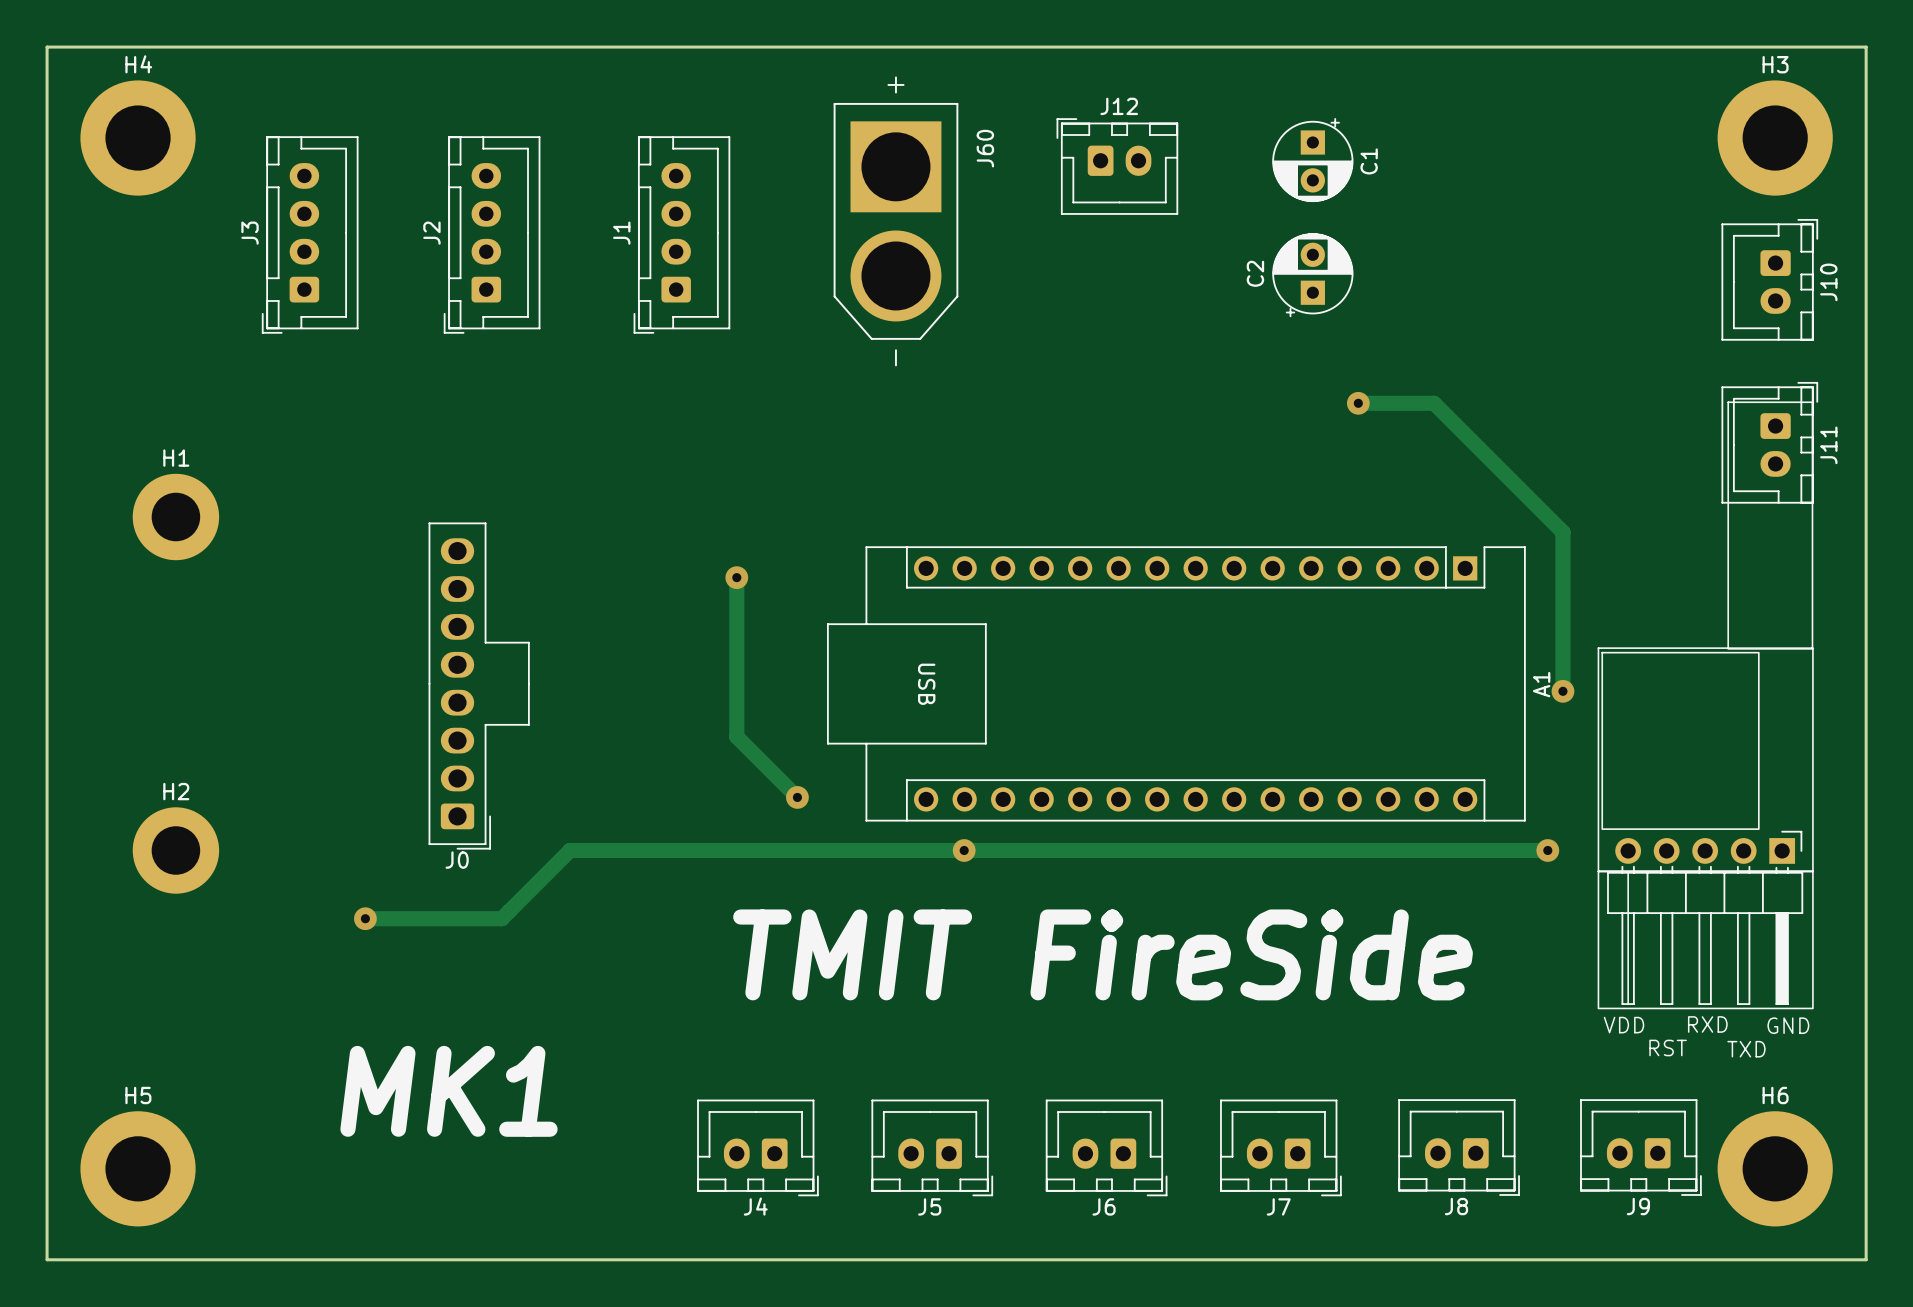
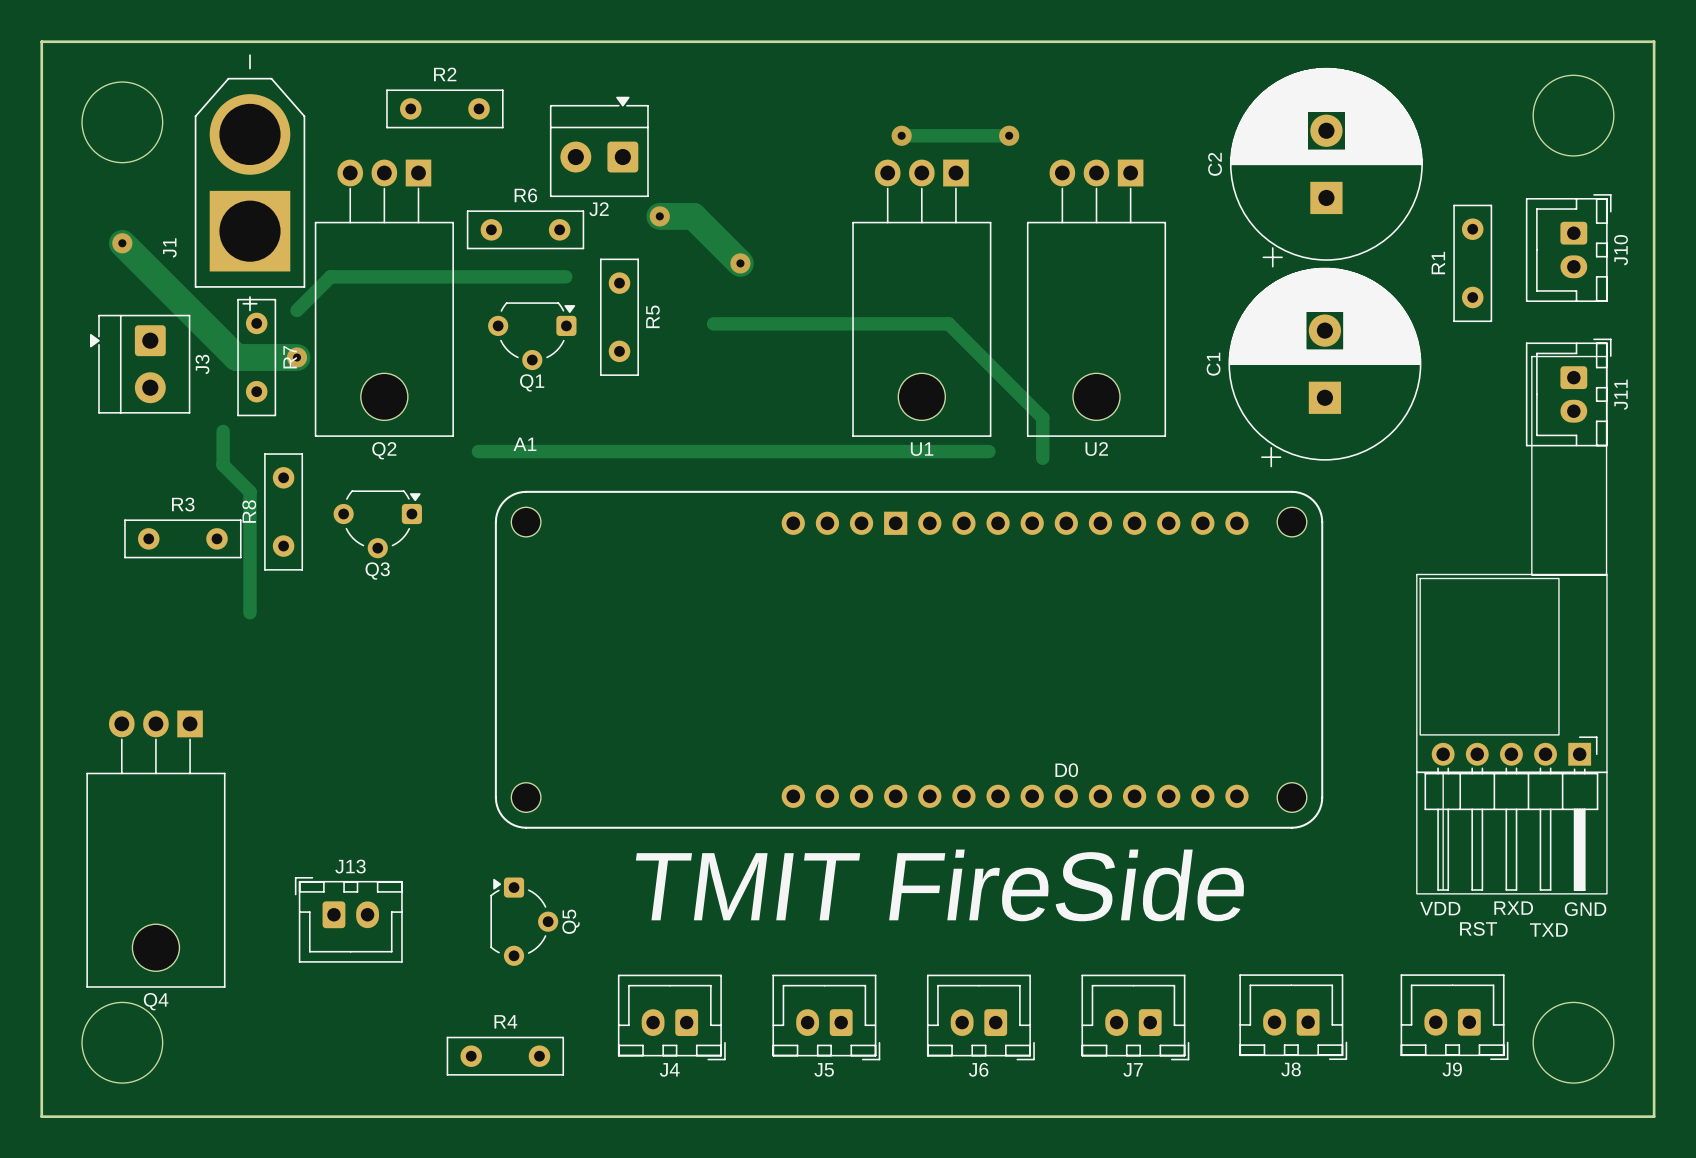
round board edge: none -> [1532, 74, 1615, 157]
round board edge: none -> [81, 81, 164, 164]
C1 footprint: [1272, 118, 1354, 203] -> [1228, 267, 1422, 468]
R2: none -> (444, 108)
J3 footprint: [261, 136, 359, 334] -> [89, 314, 191, 414]
J2 footprint: [443, 136, 541, 334] -> [549, 96, 649, 198]
J1 footprint: [633, 136, 731, 334] -> [194, 54, 306, 312]
H4: (138, 138) -> none
H3: (1775, 138) -> none
track: none -> (901, 135) (1009, 135)
via: none -> (901, 135)
via: none -> (1009, 135)
C1 name position: C1 (1369, 161) -> C1 (1213, 364)
J12: (1117, 166) -> none
J60: (895, 221) -> none
J3 name position: J3 (250, 233) -> J3 (202, 364)
J2 name position: J2 (431, 233) -> J2 (599, 209)
J1 name position: J1 (621, 233) -> J1 (169, 247)
C2 footprint: [1272, 233, 1354, 318] -> [1229, 67, 1423, 268]
track: none -> (659, 216) (693, 216) (740, 263)
via: none -> (659, 216)
R6: none -> (525, 229)
C2 name position: C2 (1255, 273) -> C2 (1215, 164)
track: none -> (122, 243) (236, 357) (297, 357)
via: none -> (122, 243)
via: none -> (740, 263)
R1: none -> (1472, 263)
track: none -> (565, 276) (330, 276) (297, 310)
Q2: none -> (384, 298)
U1: none -> (921, 298)
U2: none -> (1096, 298)
R5: none -> (619, 317)
track: none -> (713, 323) (948, 323) (1042, 417) (1042, 458)
Q1: none -> (532, 336)
R7: none -> (256, 357)
via: none -> (297, 357)
track: (1358, 403) (1434, 403) (1562, 532) (1562, 691) -> none
via: (1358, 403) -> none
track: none -> (223, 431) (223, 464) (249, 491) (249, 612)
track: none -> (478, 451) (989, 451)
H1: (175, 517) -> none
A1 footprint: [827, 546, 1526, 822] -> [494, 490, 1324, 829]
R8: none -> (283, 511)
track: (736, 577) (736, 736) (797, 797) -> none
via: (736, 577) -> none
Q3: none -> (377, 524)
R3: none -> (182, 538)
A1 name position: A1 (1541, 684) -> A1 (524, 444)
J0: (479, 686) -> none
via: (1562, 691) -> none
via: (797, 797) -> none
H2: (175, 850) -> none
via: (964, 850) -> none
track: (1547, 850) (570, 850) (501, 918) (365, 918) -> none
via: (1547, 850) -> none
via: (365, 918) -> none
text position: TMIT FireSide (1103, 954) -> TMIT FireSide (941, 885)
Q4: none -> (155, 849)
J13: none -> (348, 919)
Q5: none -> (524, 921)
text: MK1 (449, 1091) -> none
round board edge: none -> [81, 1001, 164, 1084]
round board edge: none -> [1532, 1001, 1615, 1084]
H5: (138, 1168) -> none
H6: (1775, 1168) -> none
R4: none -> (505, 1056)

